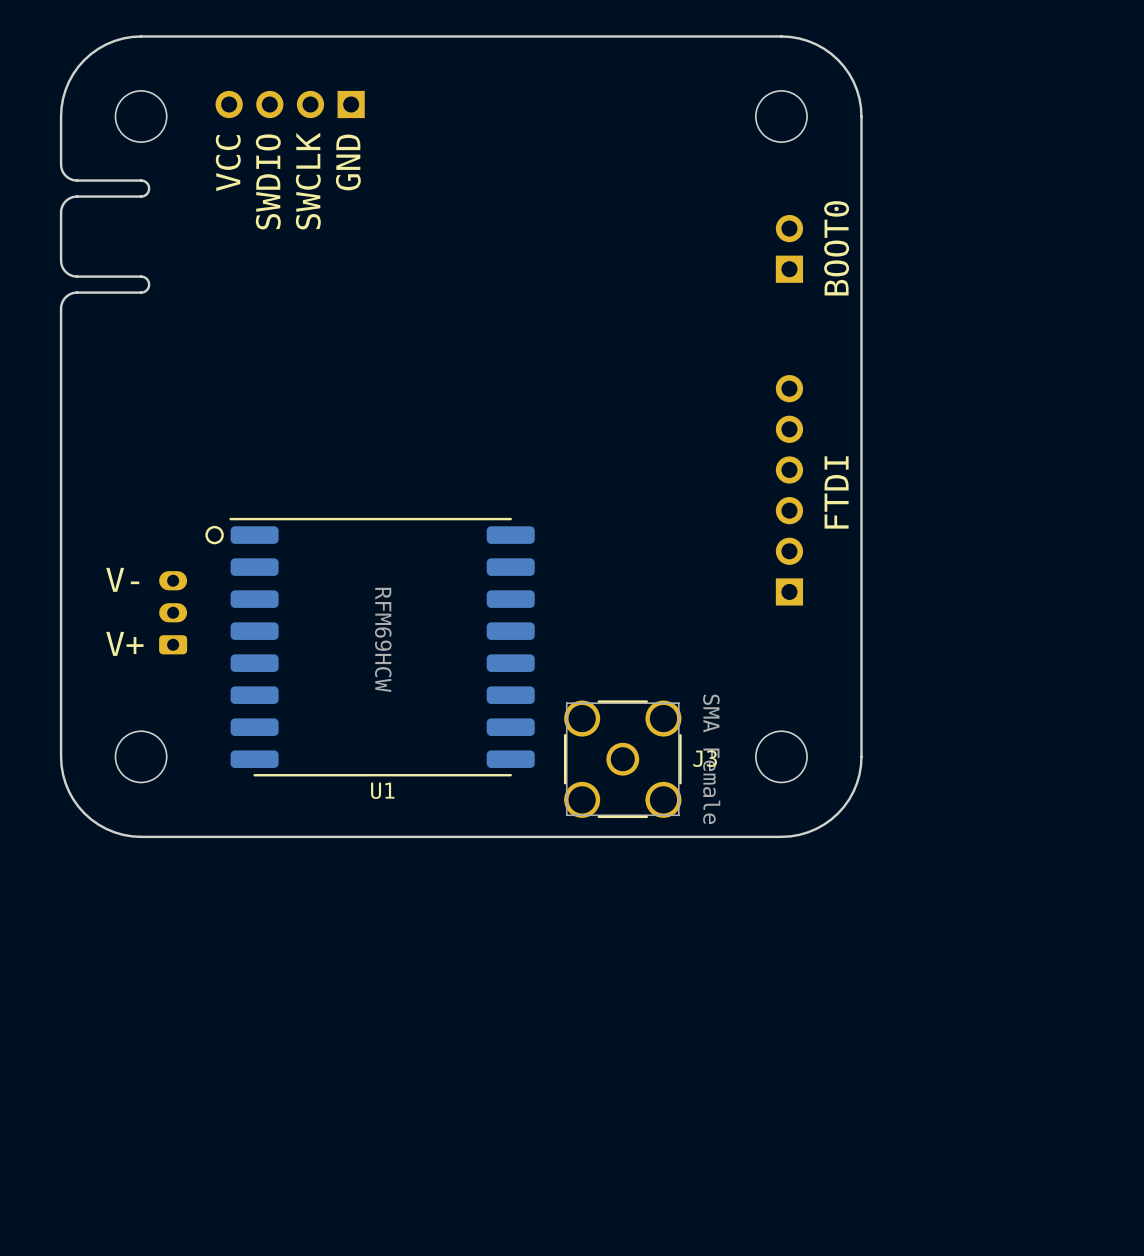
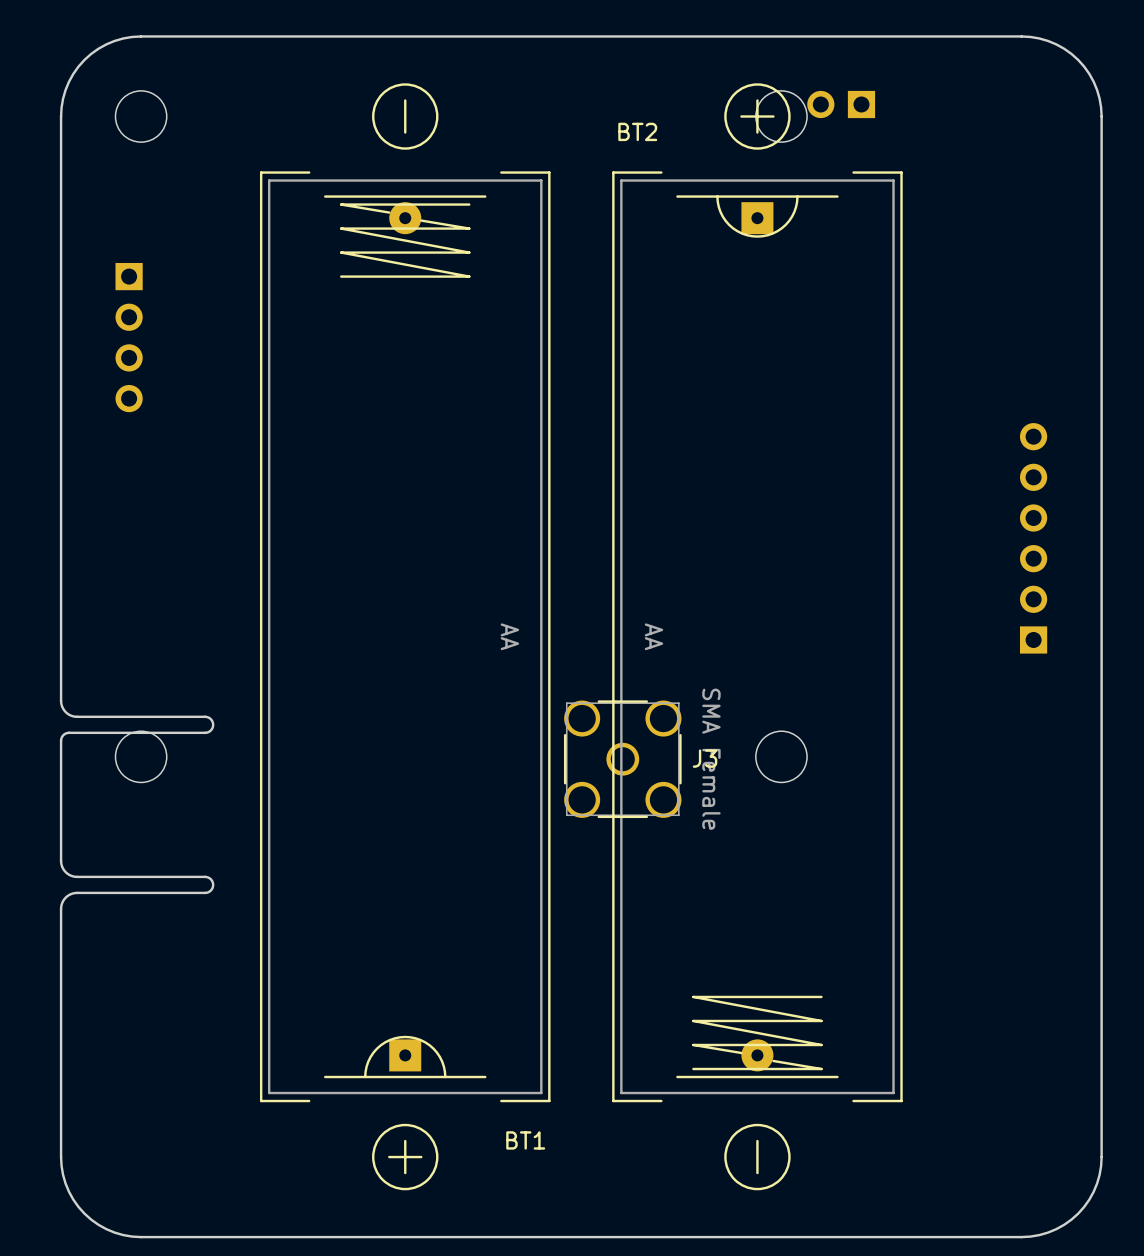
board edge: (781, 36) (799, 38) (816, 44) (838, 59) (853, 81) (860, 107) (861, 756) (859, 774) (853, 791) (838, 813) (824, 824) (807, 832) (781, 836) (132, 836) (106, 828) (84, 813) (73, 799) (65, 783) (61, 756) -> (781, 36) (1021, 36) (1039, 38) (1056, 44) (1078, 59) (1093, 81) (1099, 98) (1101, 116) (1101, 1157) (1099, 1174) (1093, 1191) (1078, 1213) (1064, 1224) (1048, 1232) (1021, 1237) (141, 1237) (123, 1235) (106, 1229) (84, 1213) (73, 1199) (65, 1183) (61, 1166) (61, 904) (65, 897) (74, 893) (206, 892) (211, 889) (213, 883) (210, 879) (206, 876) (77, 876) (67, 873) (62, 867) (61, 860) (61, 756)
part rotation: 0° (290, 104) -> 90° counterclockwise (129, 337)
part position: (290, 104) -> (129, 337)
text: GND (348, 162) -> none
text: VCC (228, 163) -> none
board edge: (61, 164) (64, 174) (72, 179) (142, 180) (147, 183) (149, 188) (147, 193) (142, 196) (72, 197) (64, 202) (61, 212) -> (61, 164) (61, 212)
text: SWDIO (268, 181) -> none
text: SWCLK (308, 181) -> none
part rotation: 0° (789, 248) -> 90° counterclockwise (841, 104)
part position: (789, 248) -> (841, 104)
text: BOOT0 (836, 248) -> none
board edge: (61, 260) (64, 270) (72, 276) (142, 276) (147, 279) (149, 284) (147, 289) (142, 292) (72, 293) (64, 298) (61, 308) -> (61, 260) (61, 308)
part position: (789, 490) -> (1033, 538)
text: FTDI (836, 492) -> none
text: V- (122, 579) -> none
part: (173, 612) -> none
BT1: none -> AA (405, 636)
BT2: none -> AA (757, 636)
text: V+ (124, 643) -> none
U1: RFM69HCW (370, 647) -> none
board edge: (61, 700) (61, 740) -> (61, 700) (65, 712) (74, 716) (205, 716) (210, 719) (213, 724) (211, 729) (206, 732) (69, 732) (63, 735) (61, 740)

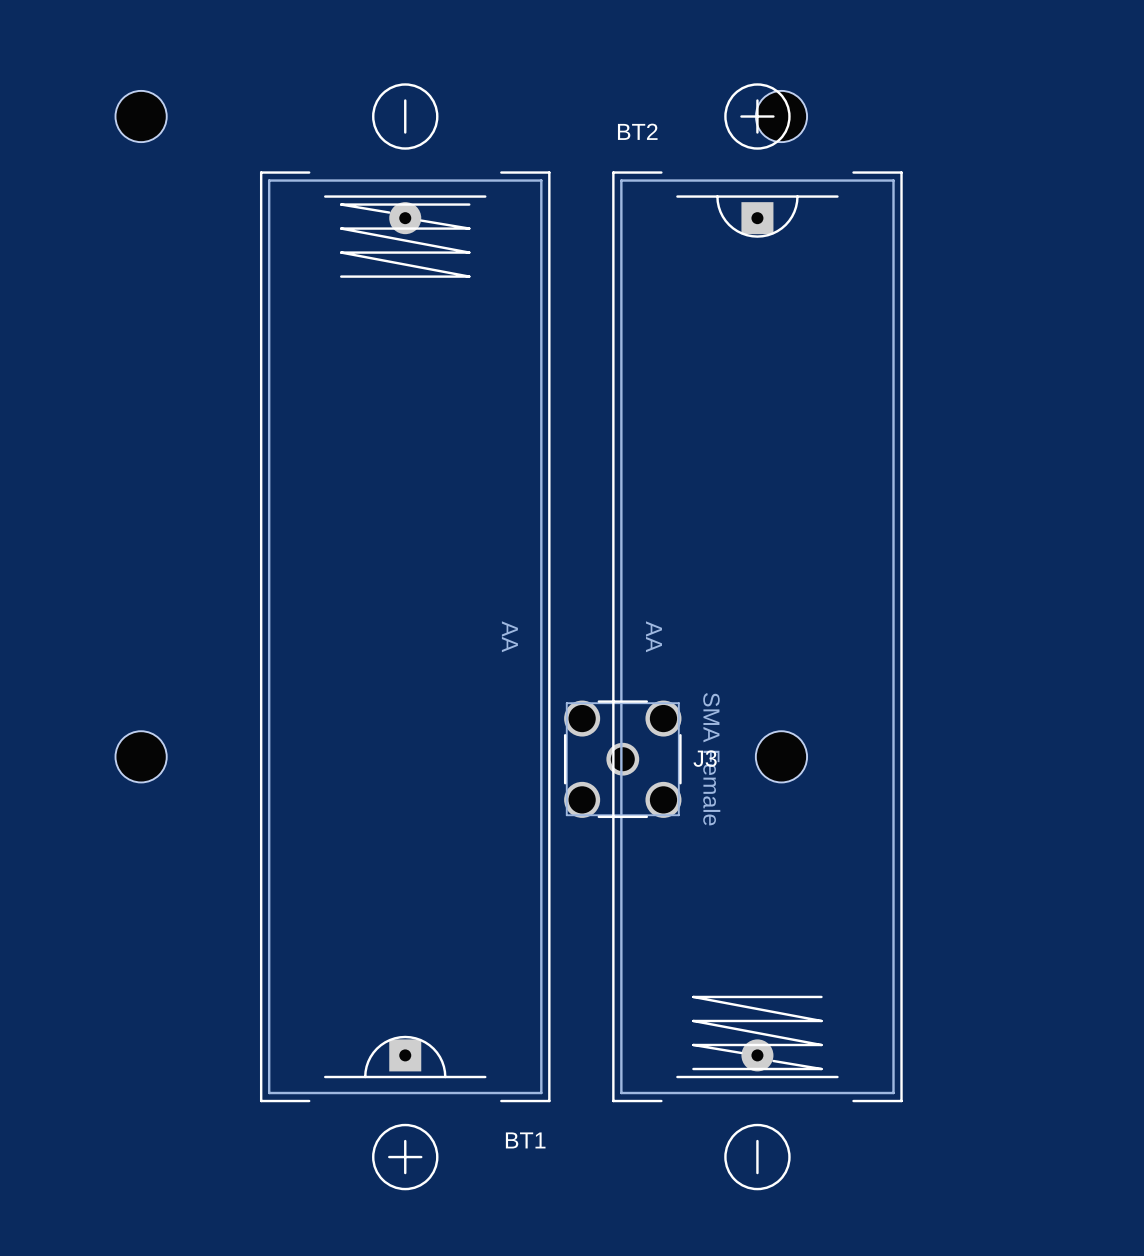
board edge: (1021, 36) (141, 36) (123, 38) (106, 44) (91, 53) (78, 66) (65, 90) (61, 116) (61, 704) (65, 712) (74, 716) (205, 716) (210, 719) (213, 724) (211, 729) (206, 732) (69, 732) (64, 734) (61, 738) (61, 860) (65, 872) (77, 876) (206, 876) (211, 880) (213, 884) (210, 890) (205, 892) (74, 893) (67, 896) (62, 902) (61, 1166) (65, 1183) (73, 1199) (91, 1219) (114, 1232) (141, 1237) (1021, 1237) (1039, 1235) (1056, 1229) (1071, 1219) (1084, 1206) (1097, 1183) (1101, 1157) (1101, 116) (1099, 98) (1093, 81) (1078, 59) (1056, 44) (1039, 38) (1021, 36) -> none
part: (841, 104) -> none
part: (129, 337) -> none
part: (1033, 538) -> none

